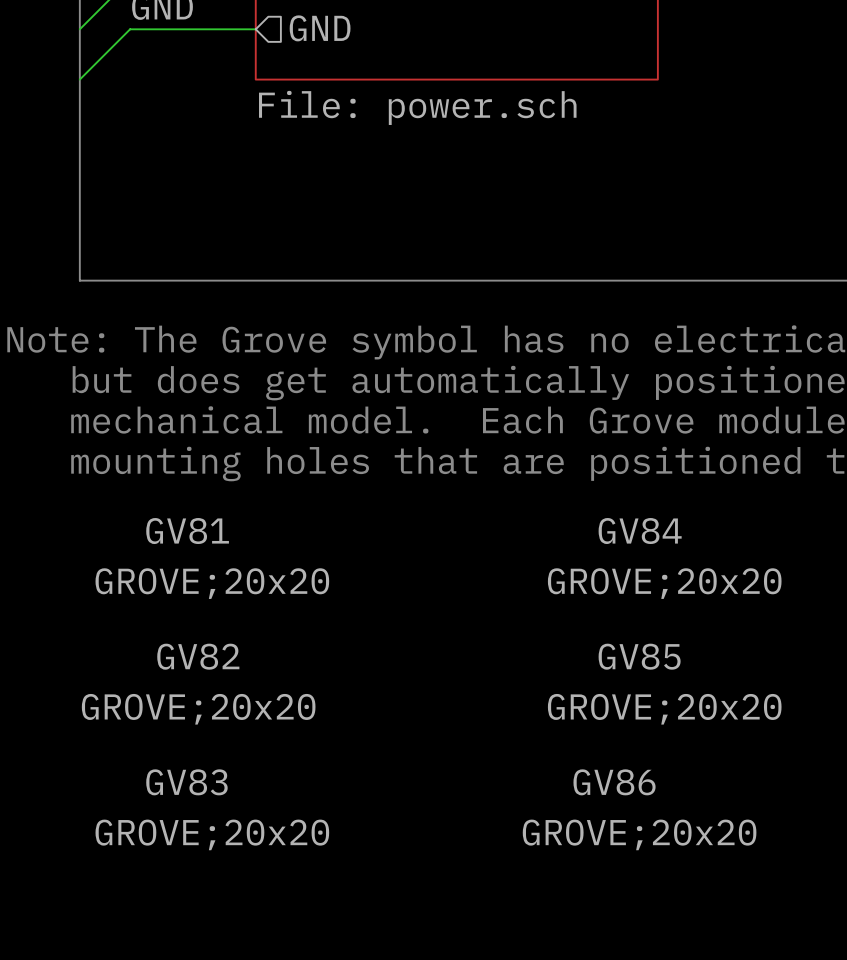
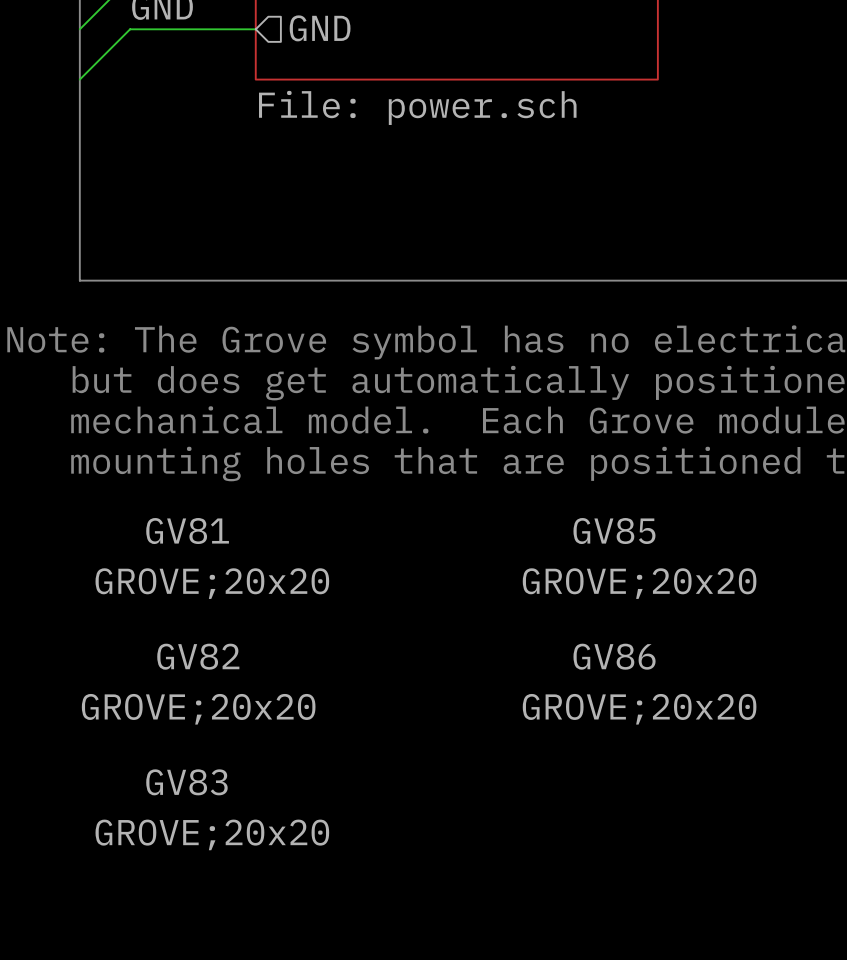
GV84: GROVE;20x20 (664, 558) -> none
GV85 position: (664, 684) -> (639, 558)
GV86 position: (639, 809) -> (639, 684)

